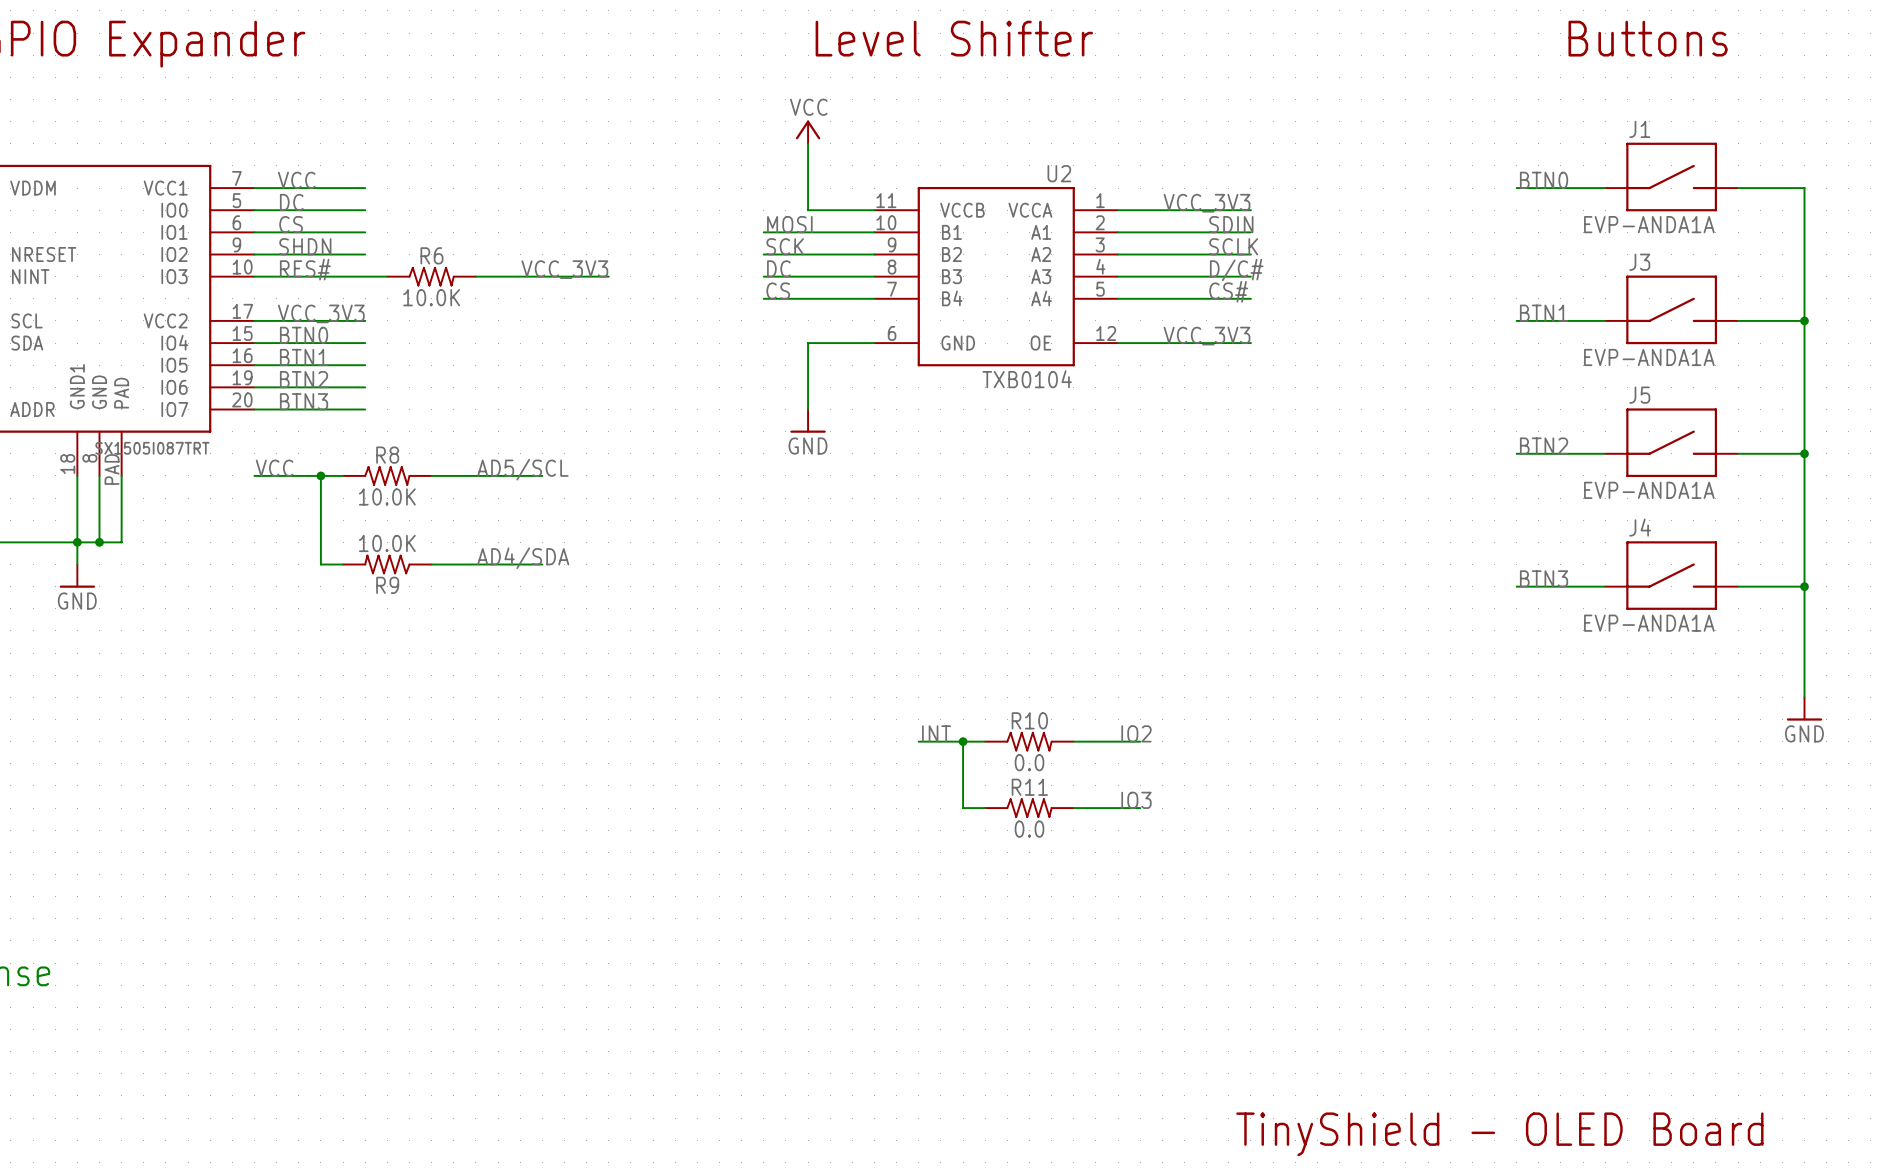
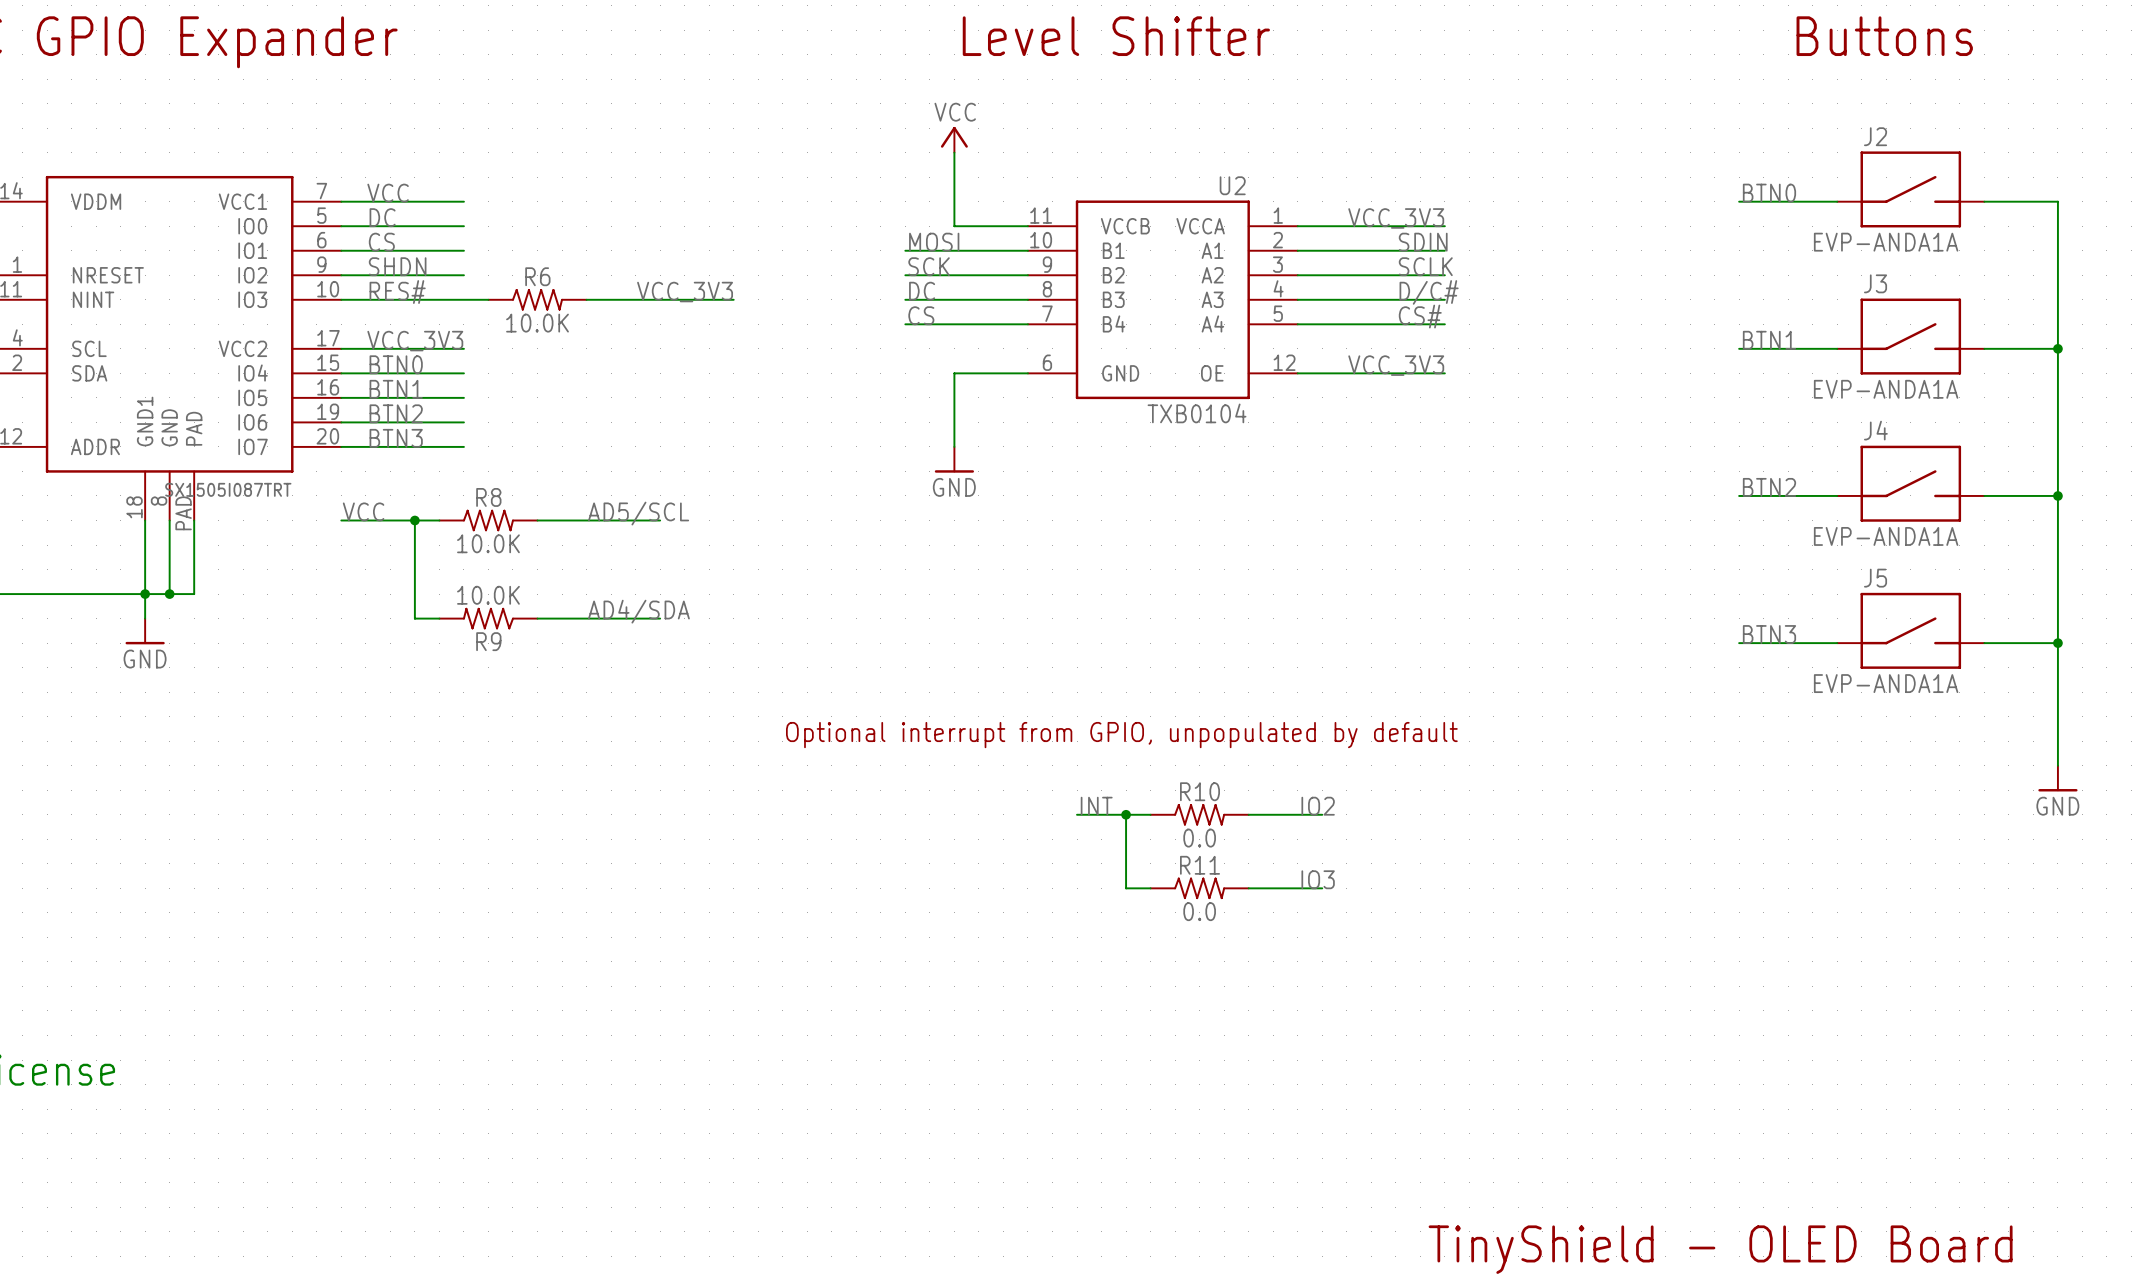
J1 name: J1 (1639, 129) -> J2 (1875, 136)
J5 name: J5 (1639, 395) -> J4 (1875, 430)
J4 name: J4 (1640, 527) -> J5 (1875, 578)
text: none -> Optional interrupt from GPIO, unpopulated by default (1121, 735)

